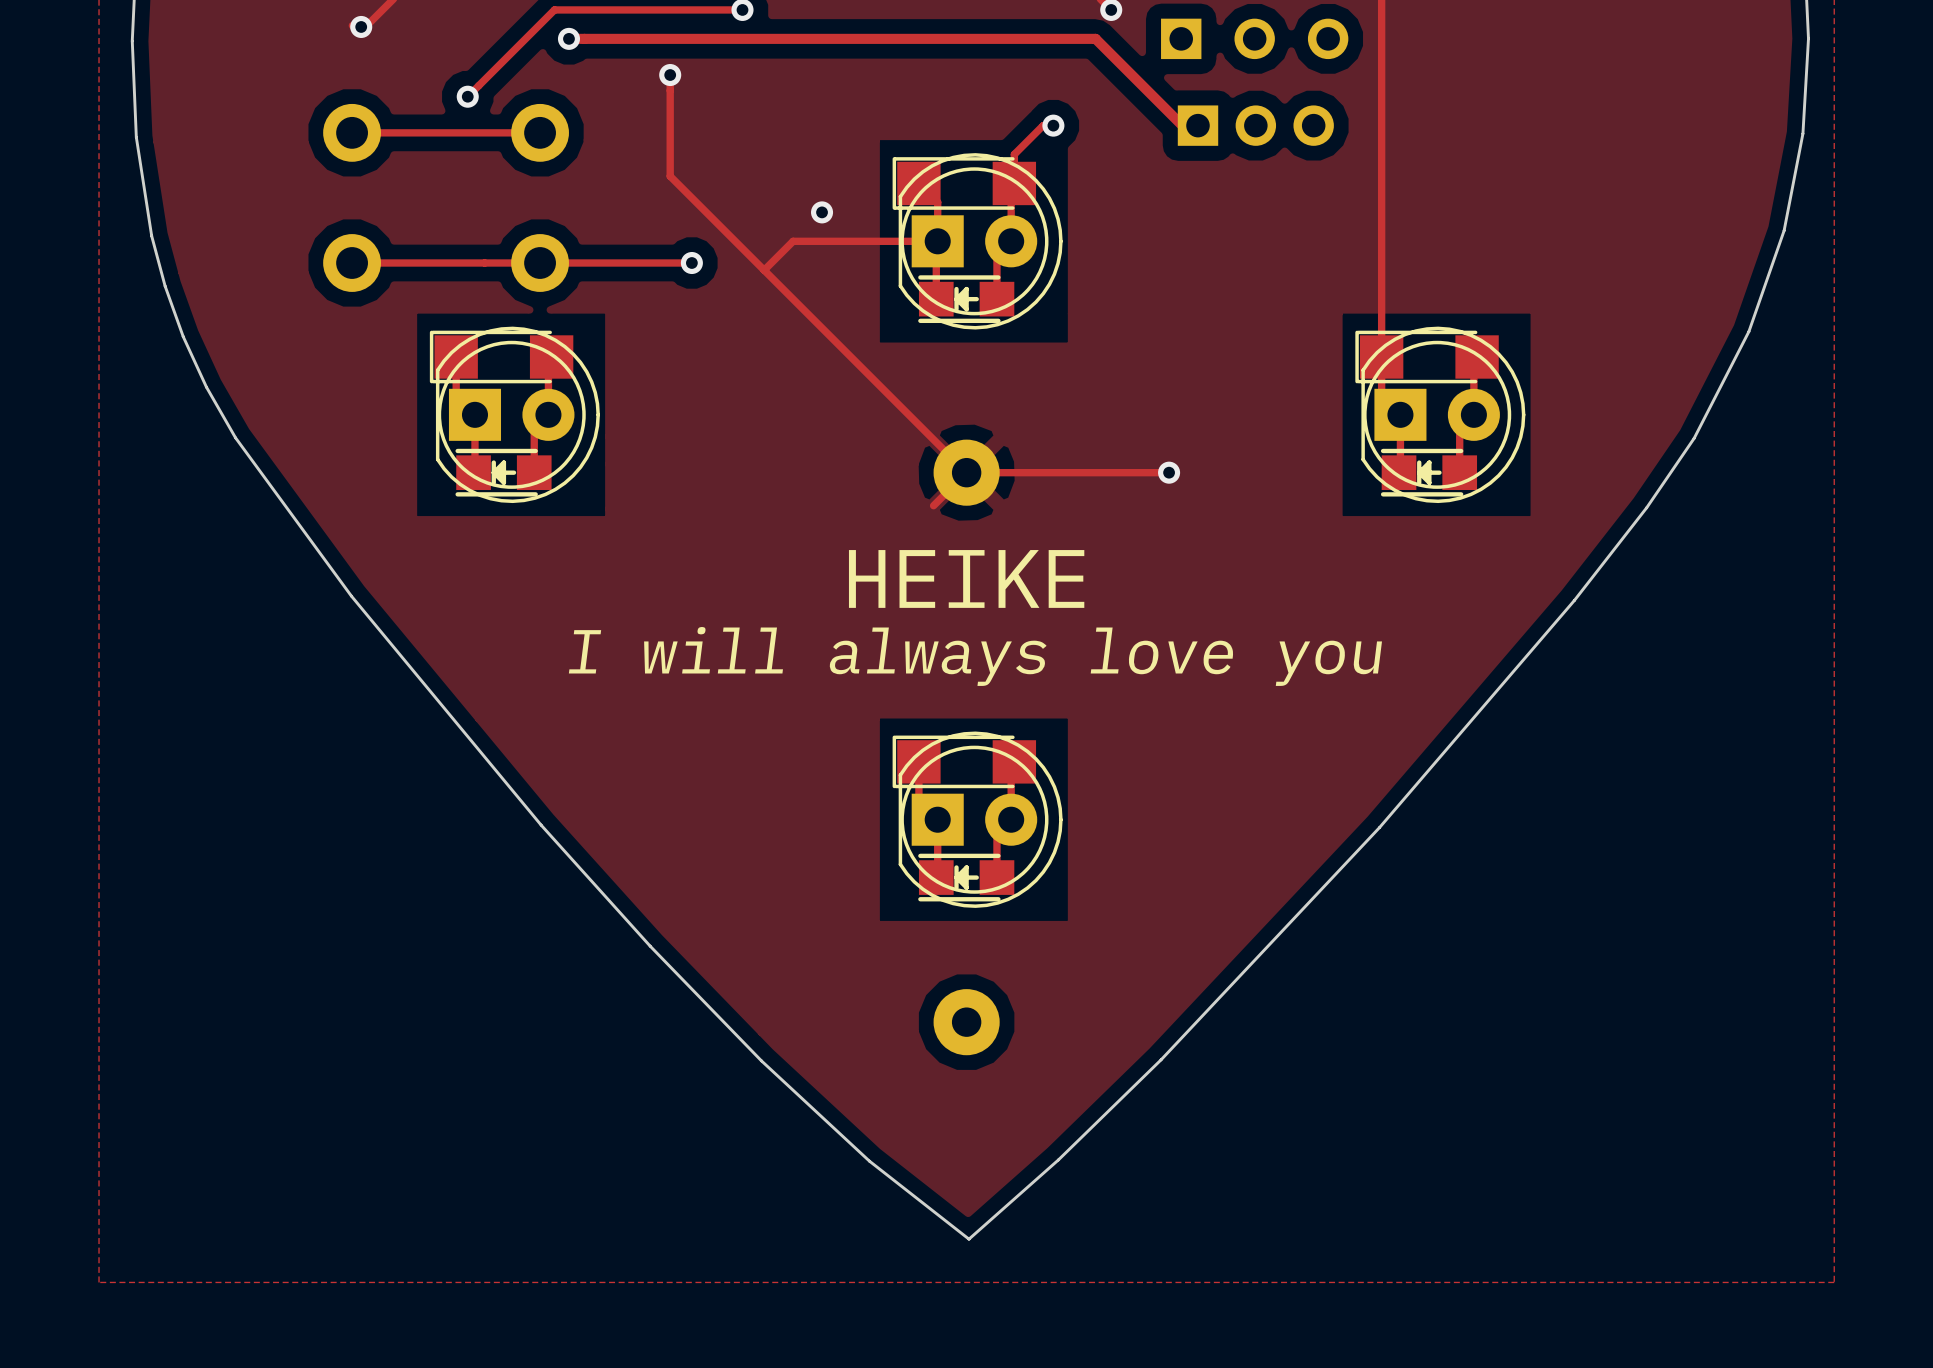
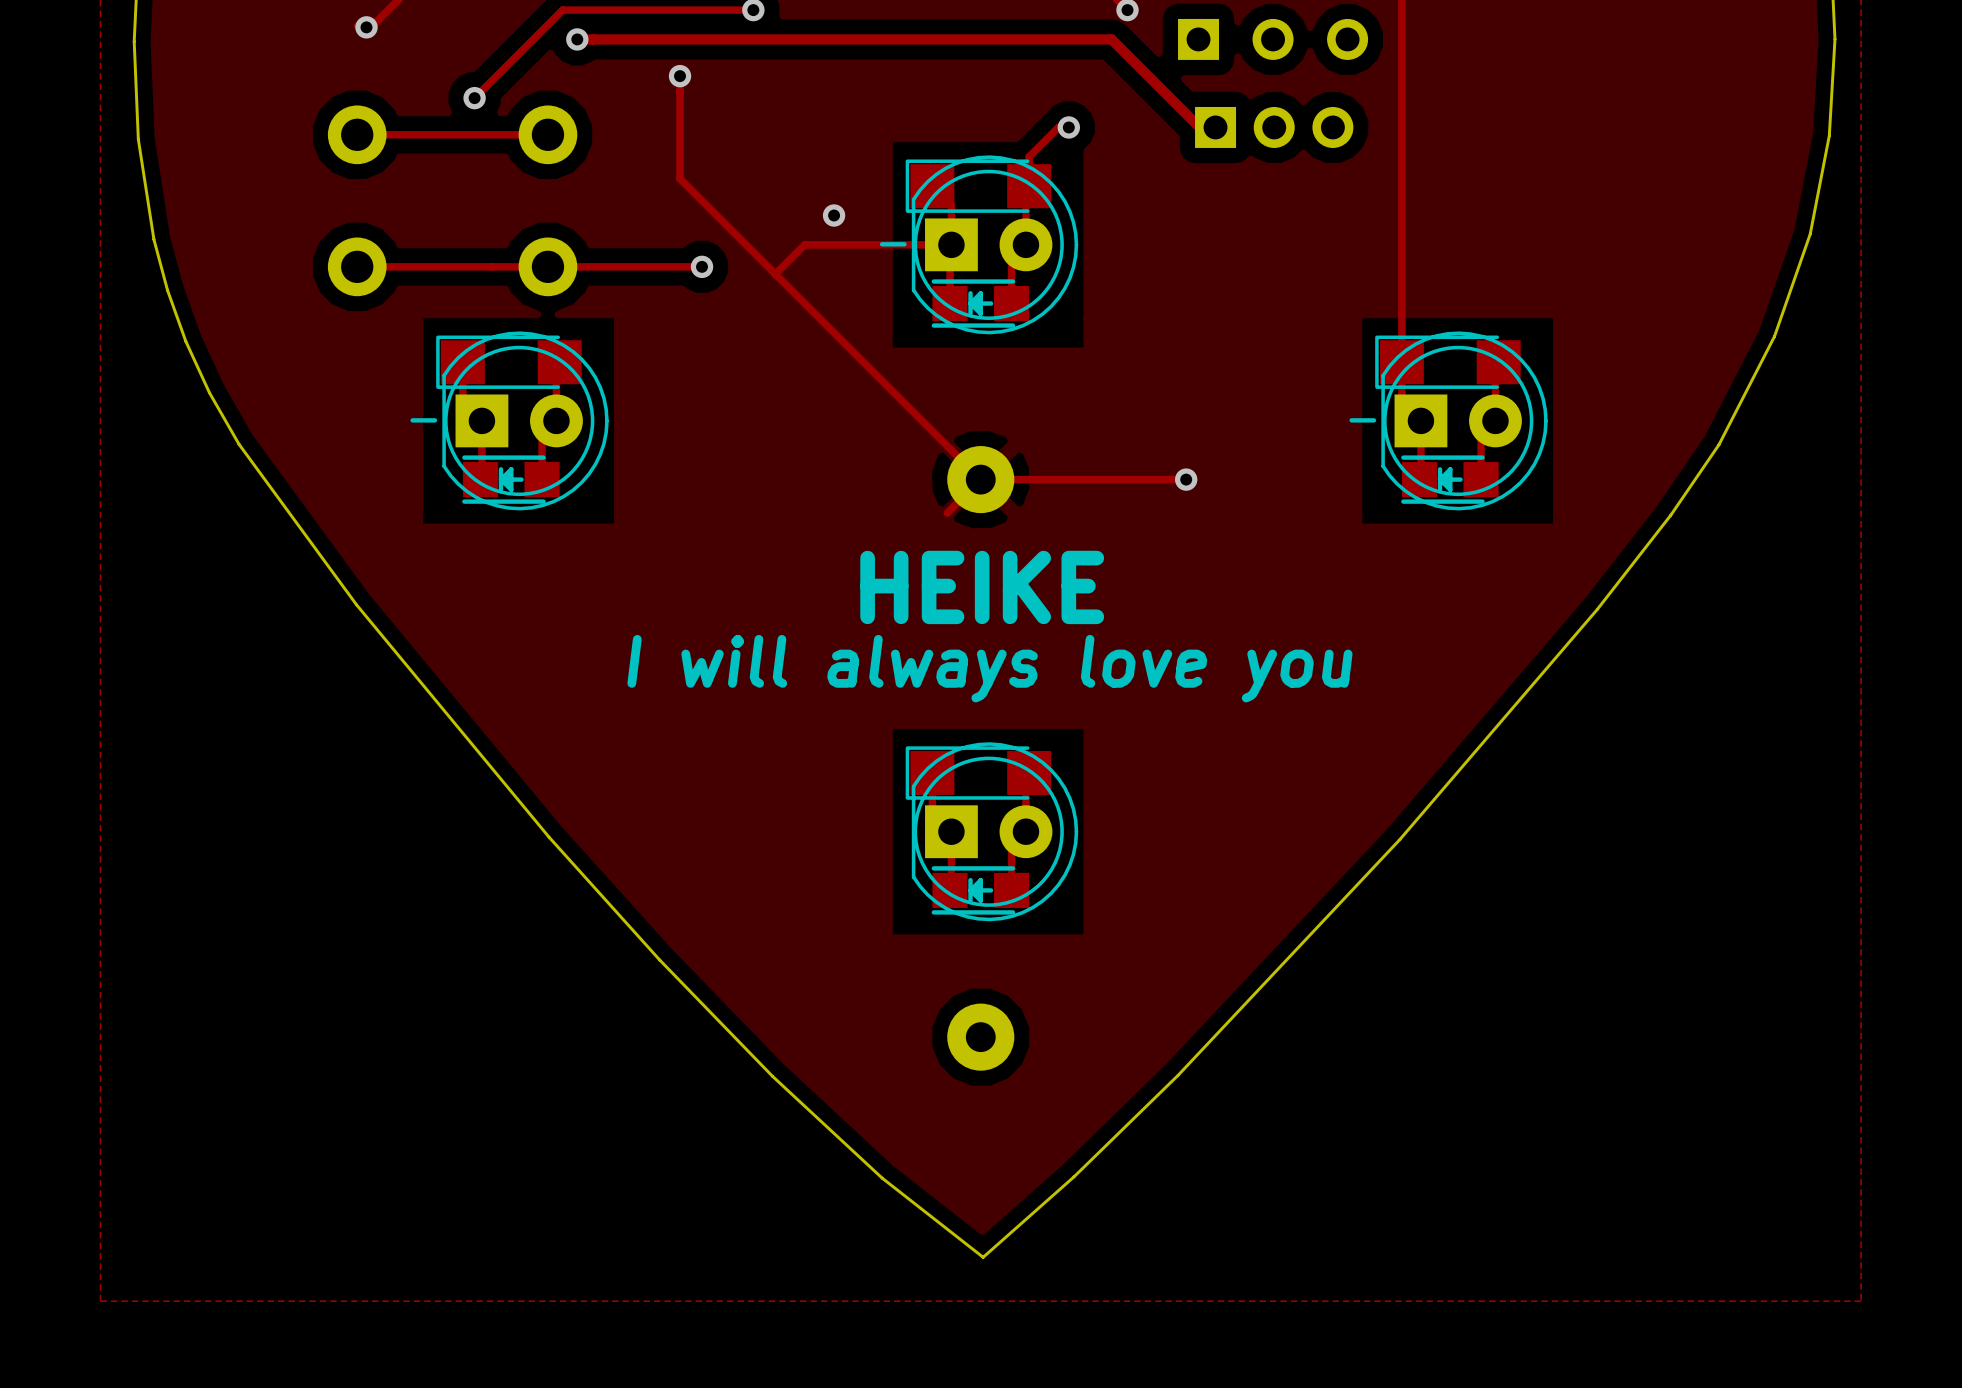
text: none -> - (893, 244)
text: none -> - (423, 420)
text: none -> - (1362, 420)

